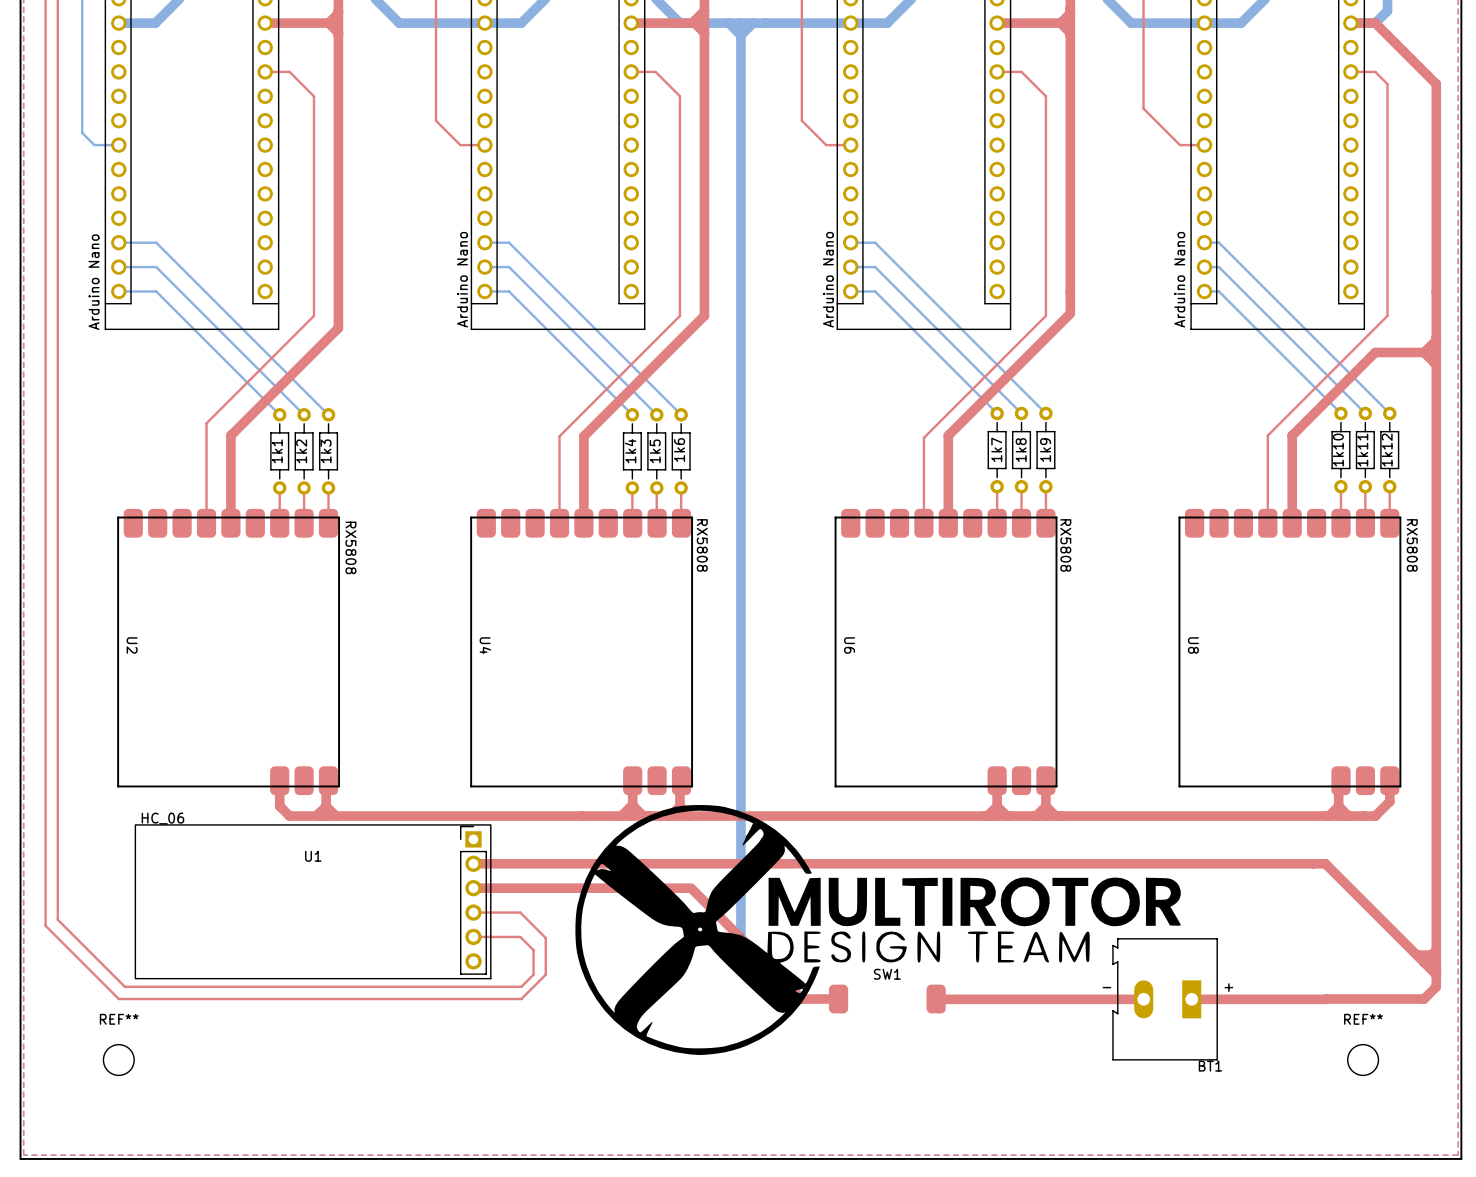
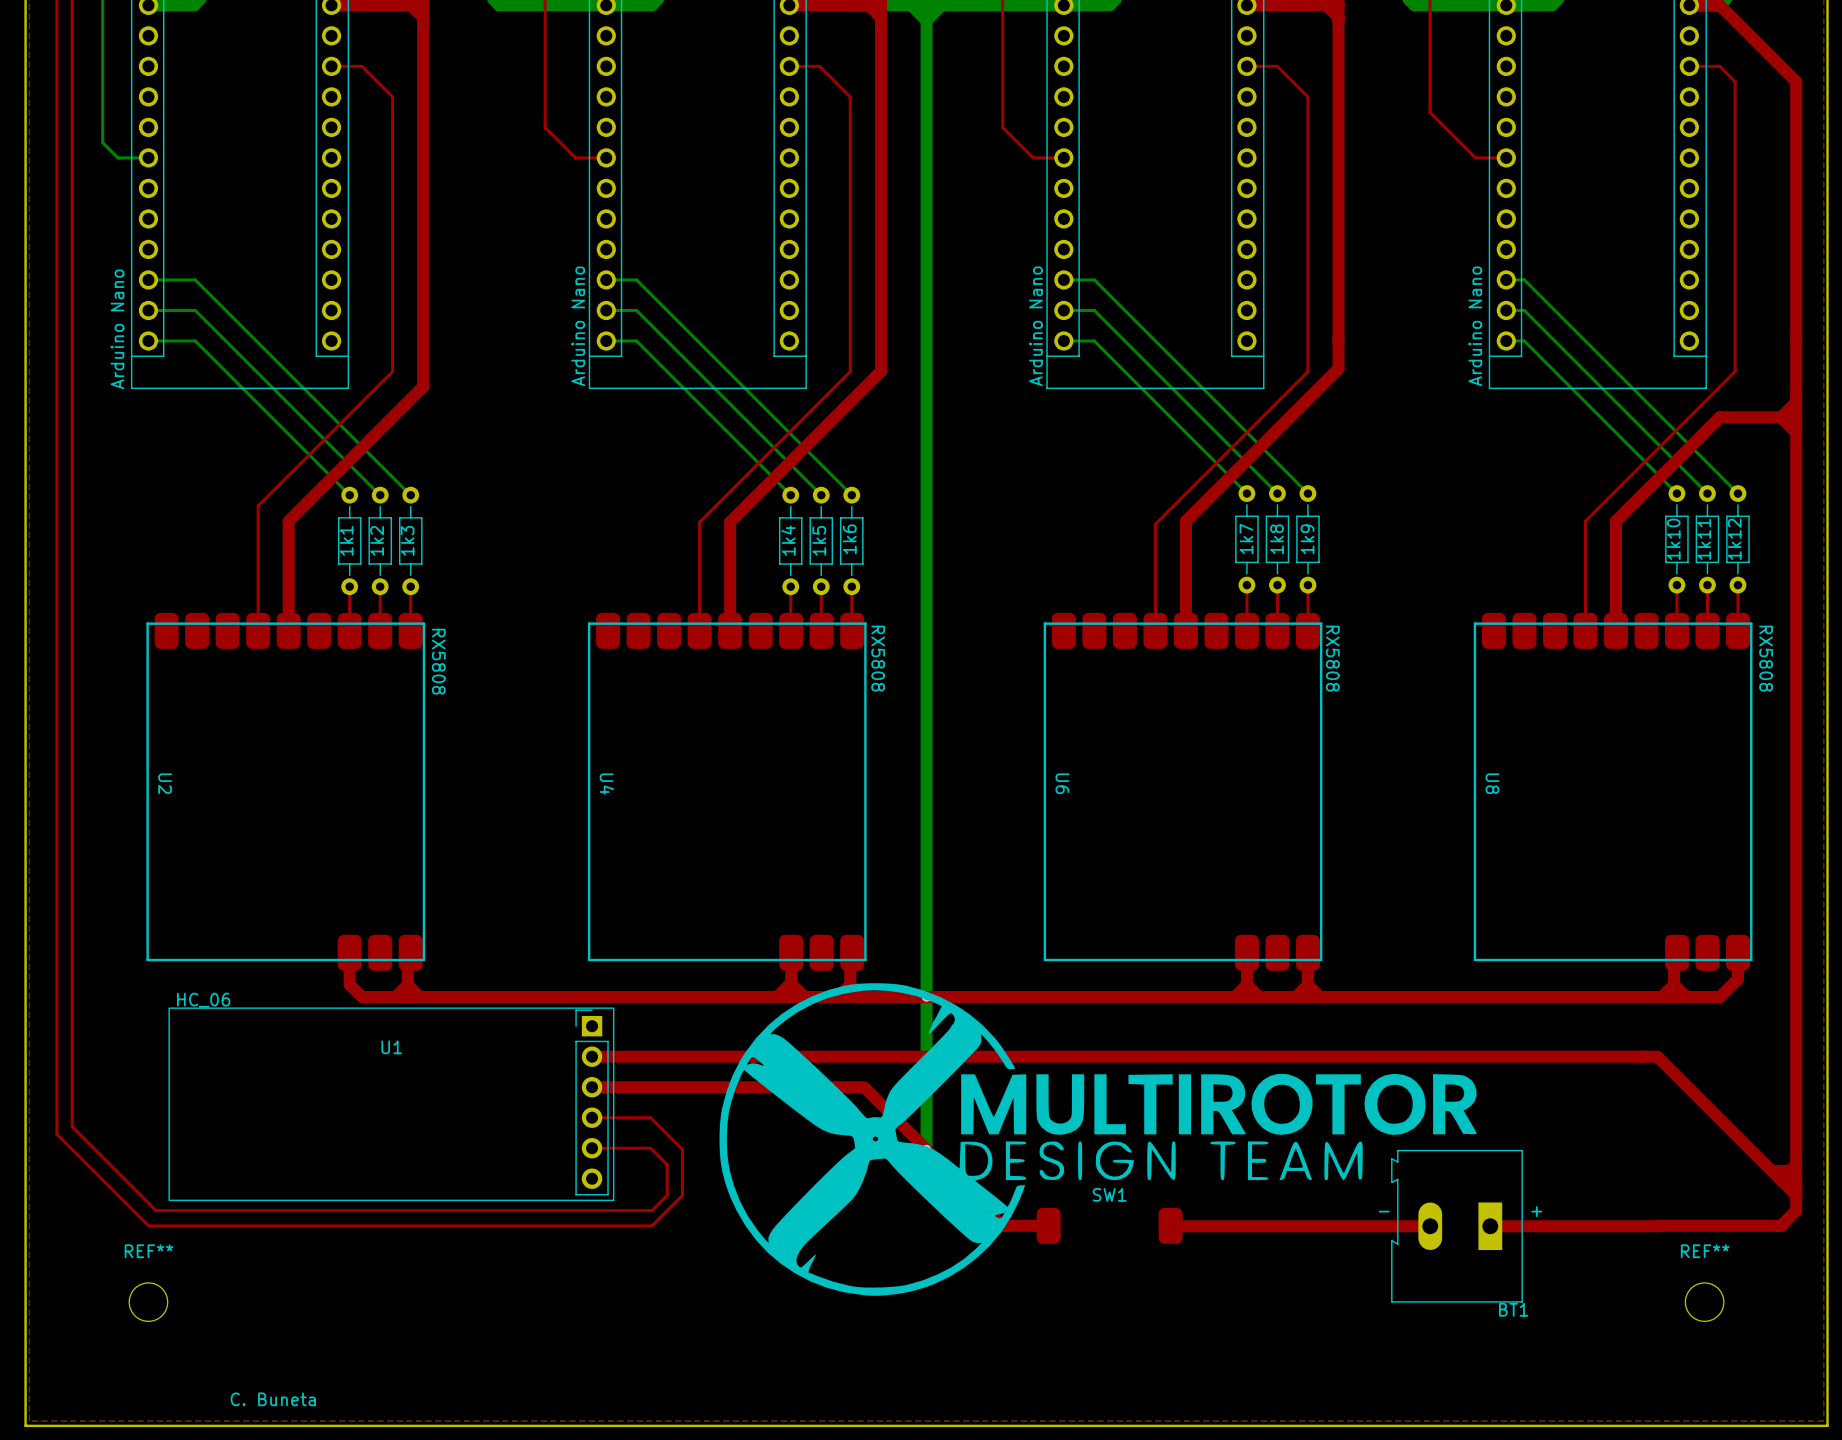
text: none -> C. Buneta (273, 1399)

